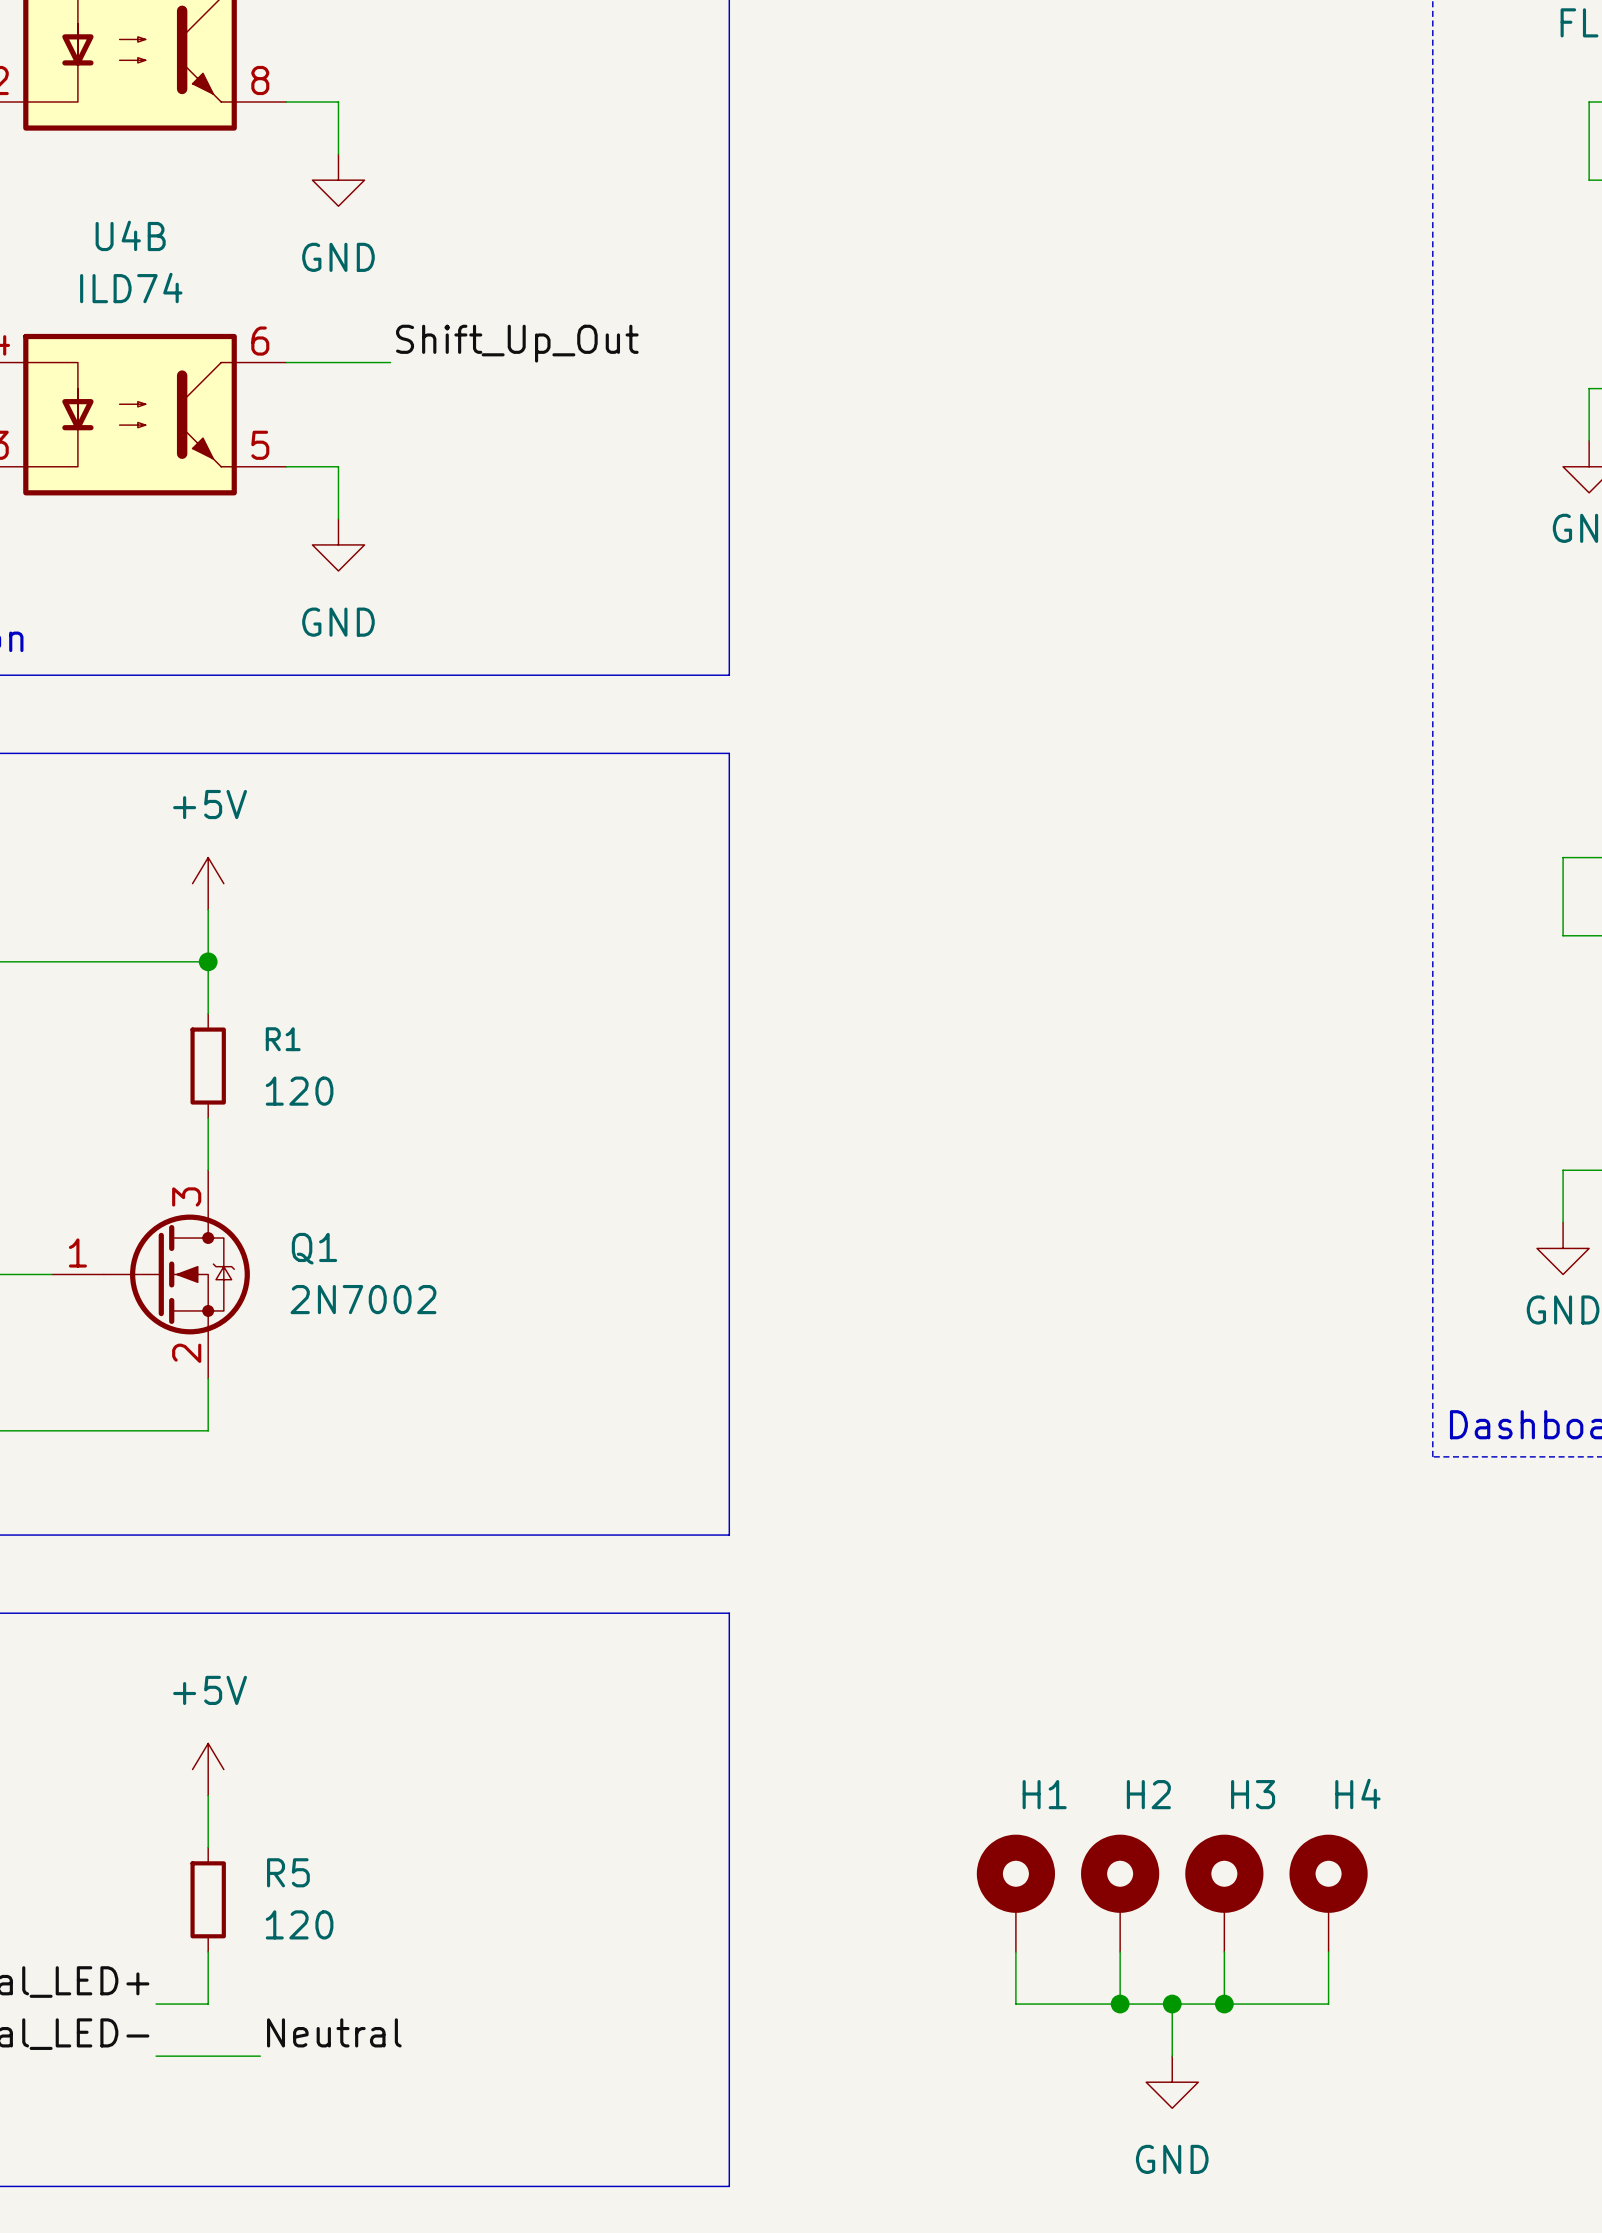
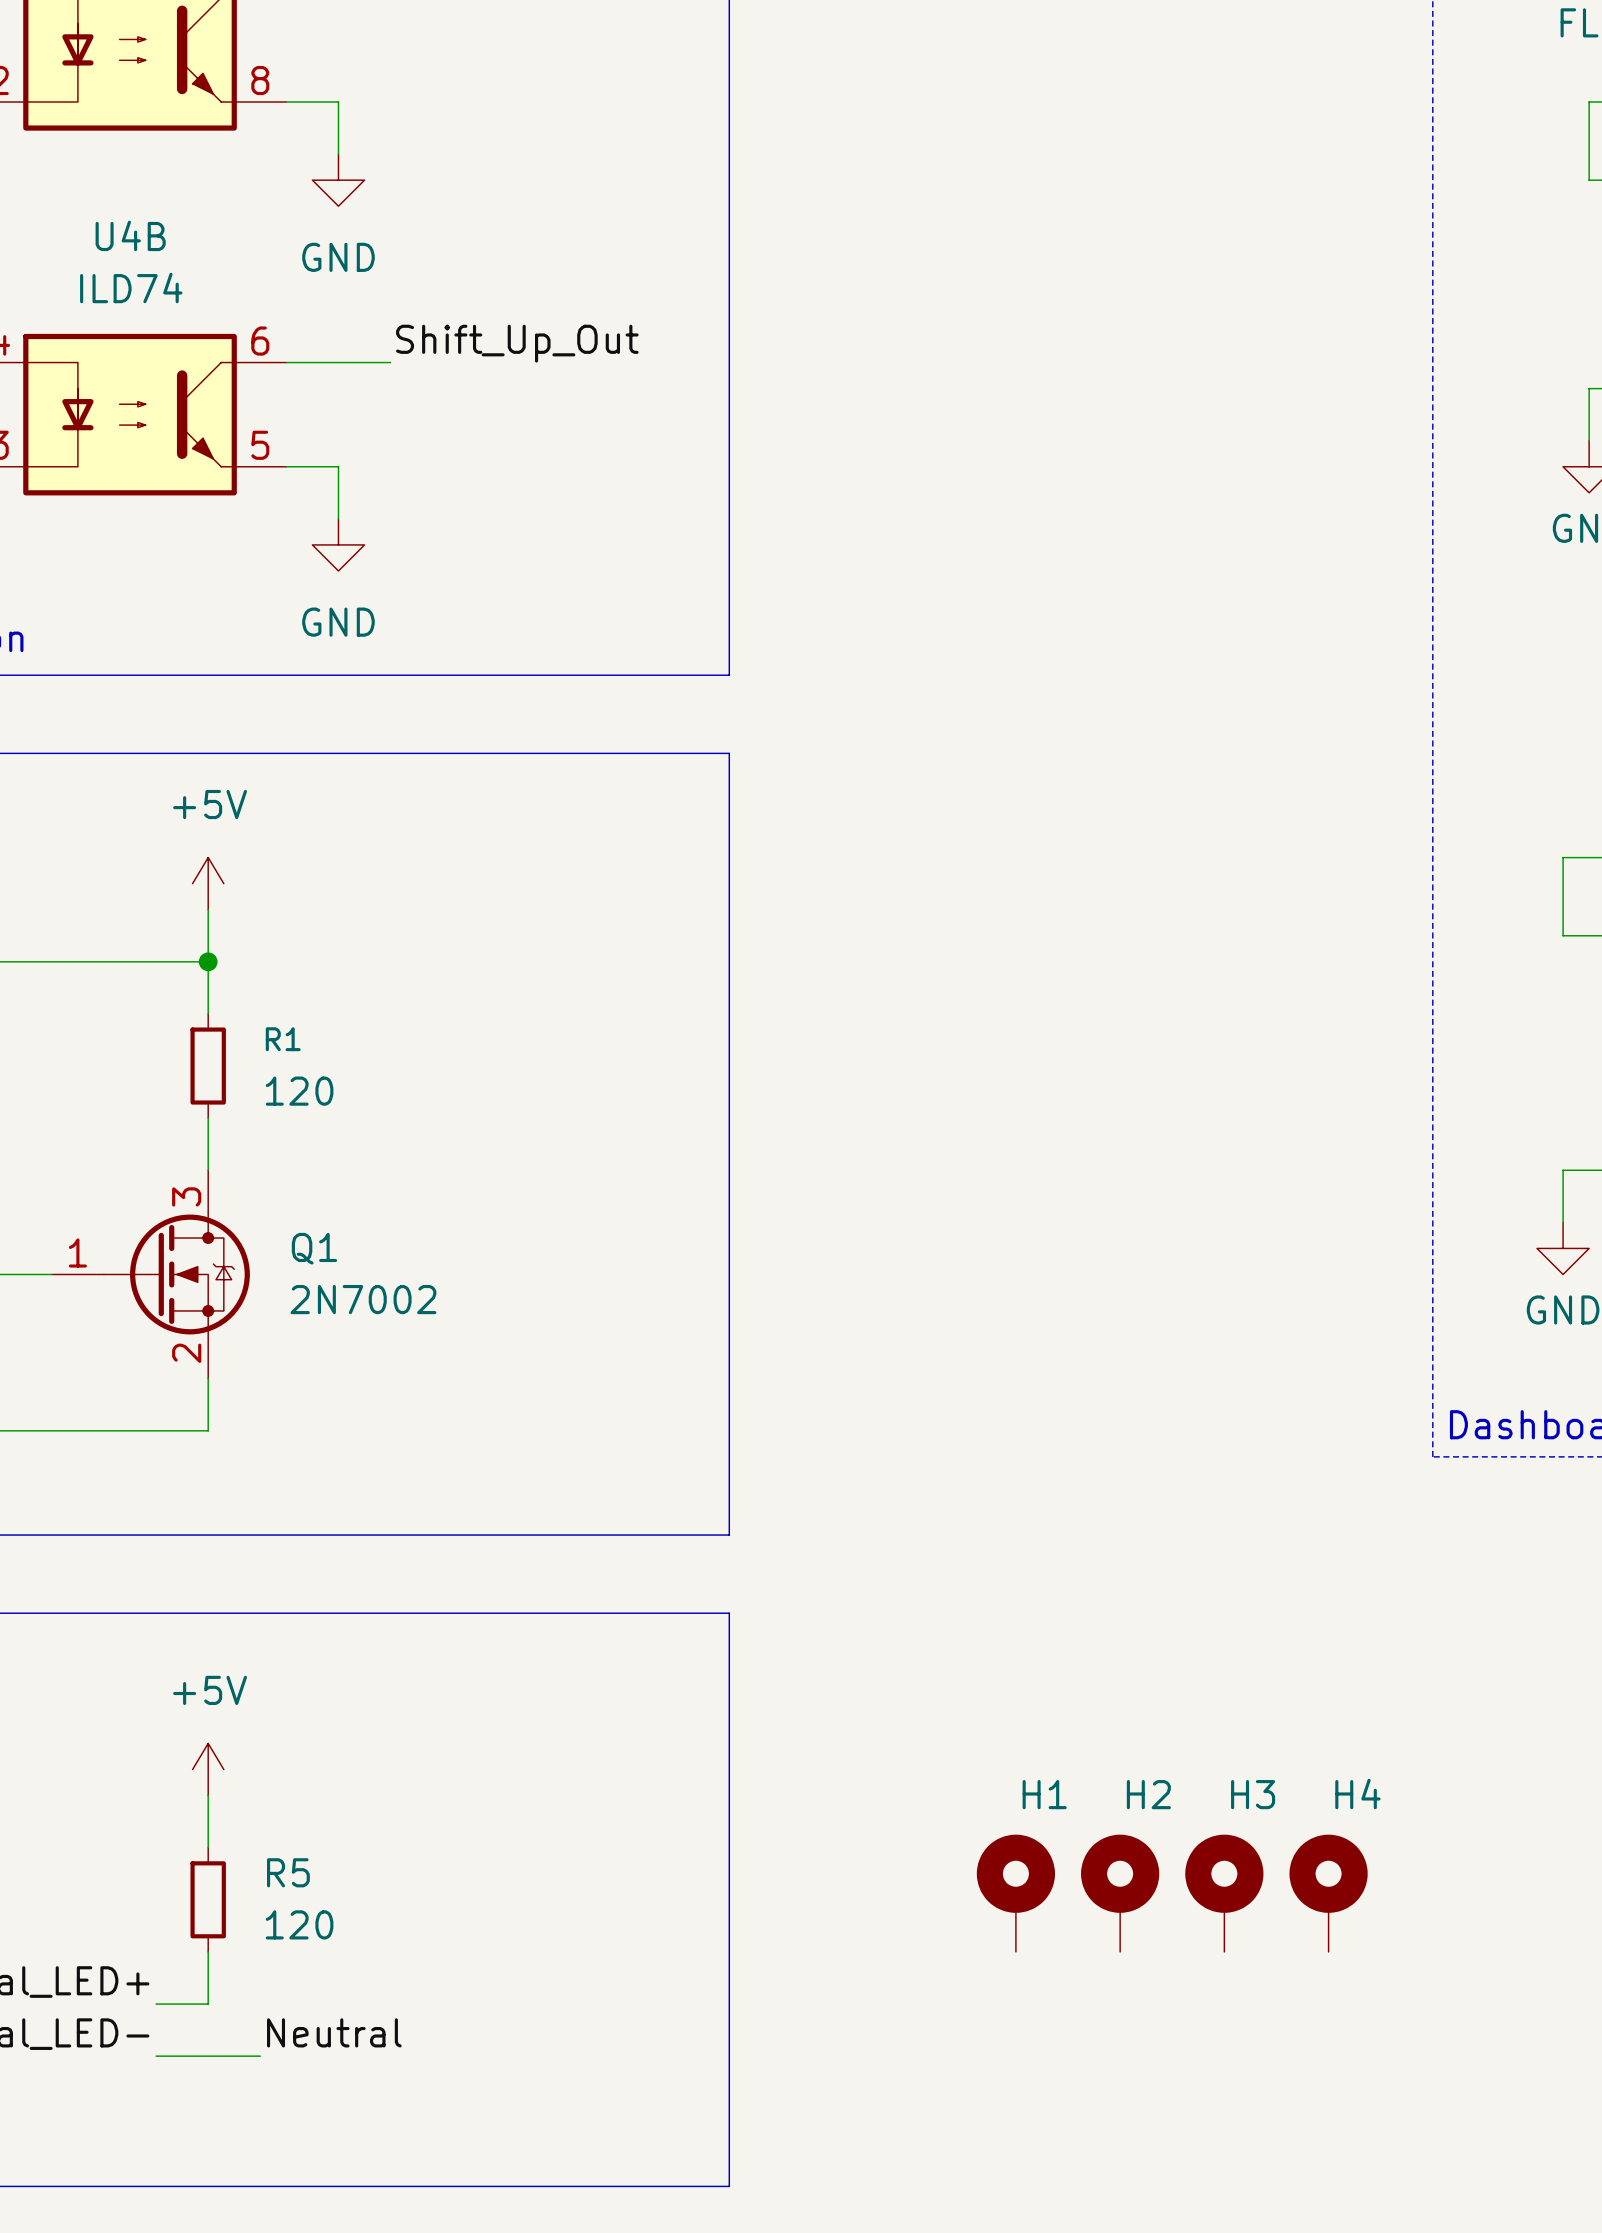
wire: (1015, 1951) (1015, 2004) (1328, 2004) (1328, 1951) -> none
wire: (1120, 1951) (1120, 2004) -> none
wire: (1224, 1951) (1224, 2004) -> none
junction: (1120, 2004) -> none
wire: (1172, 2004) (1172, 2056) -> none
junction: (1172, 2004) -> none
junction: (1224, 2004) -> none
power symbol: GND (1172, 2082) -> none

